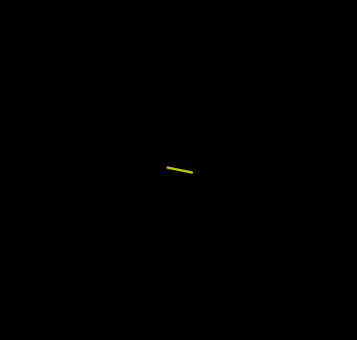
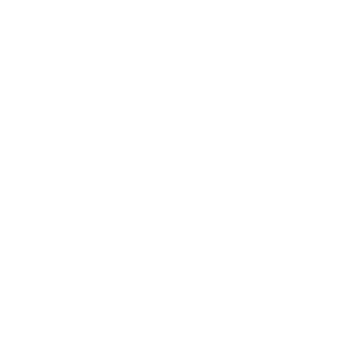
board edge: (167, 167) (191, 172) -> none

